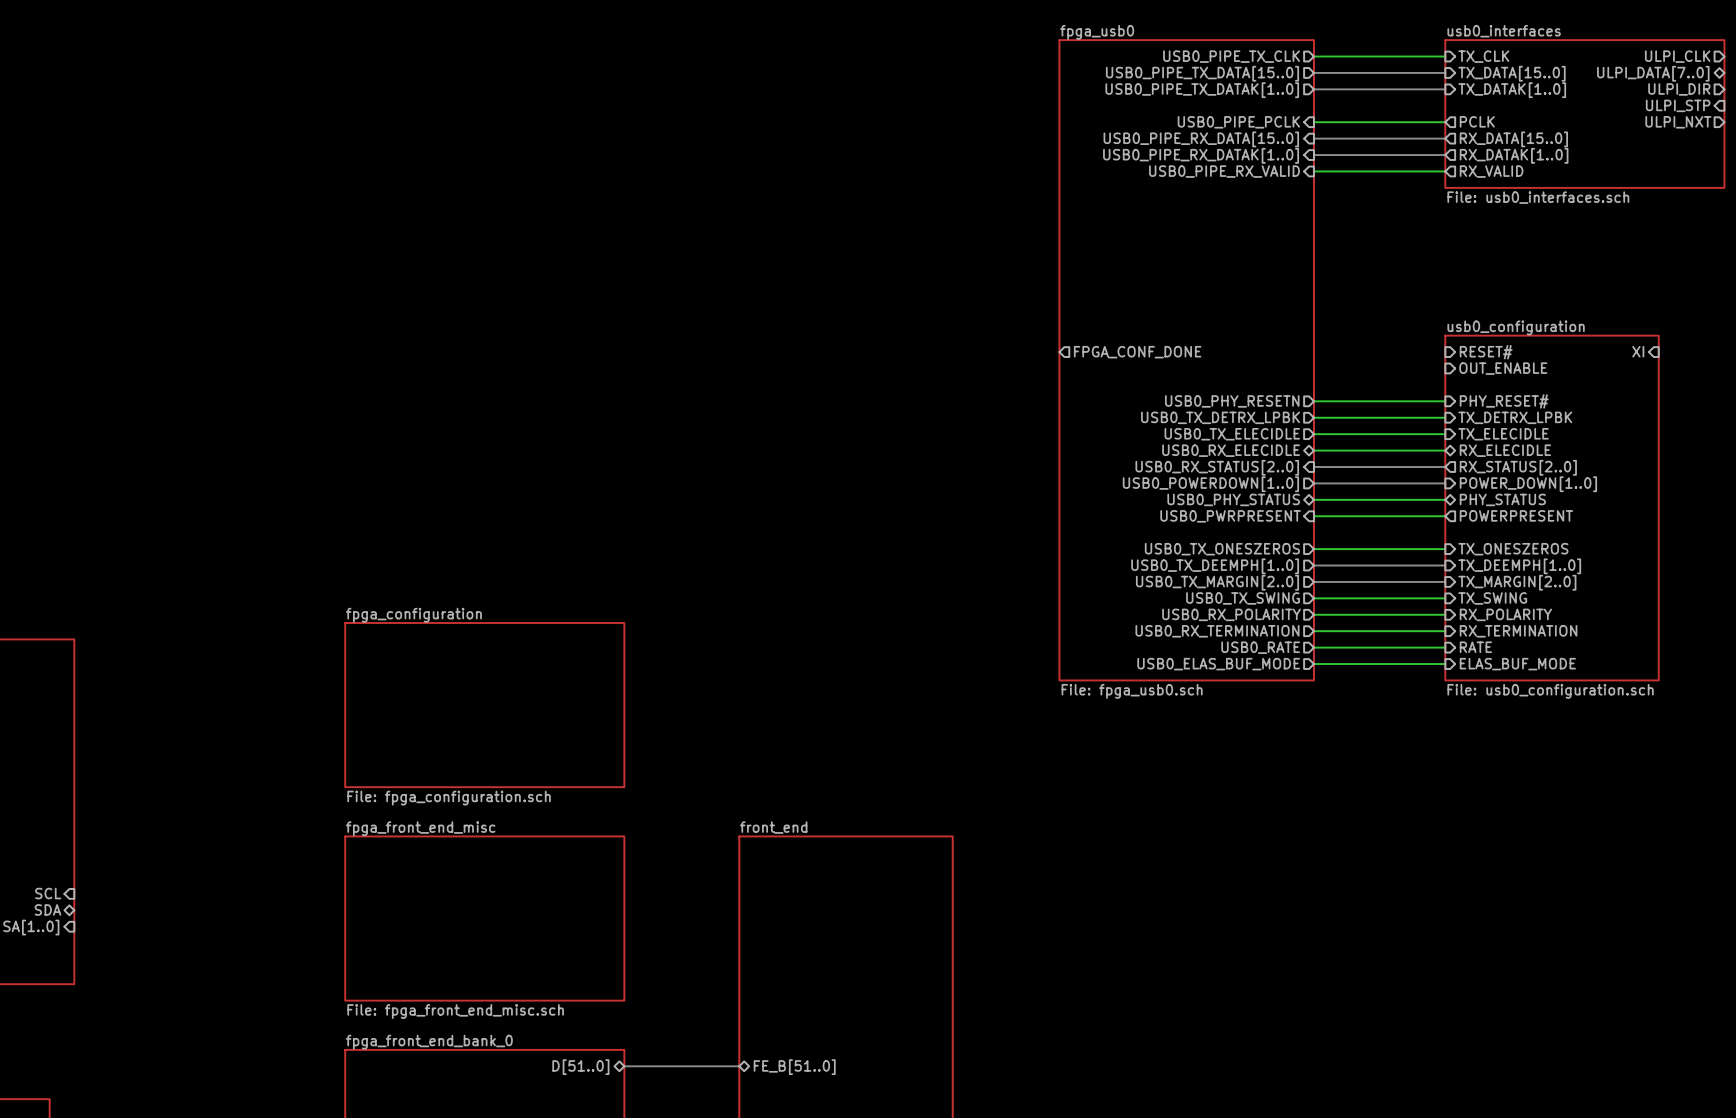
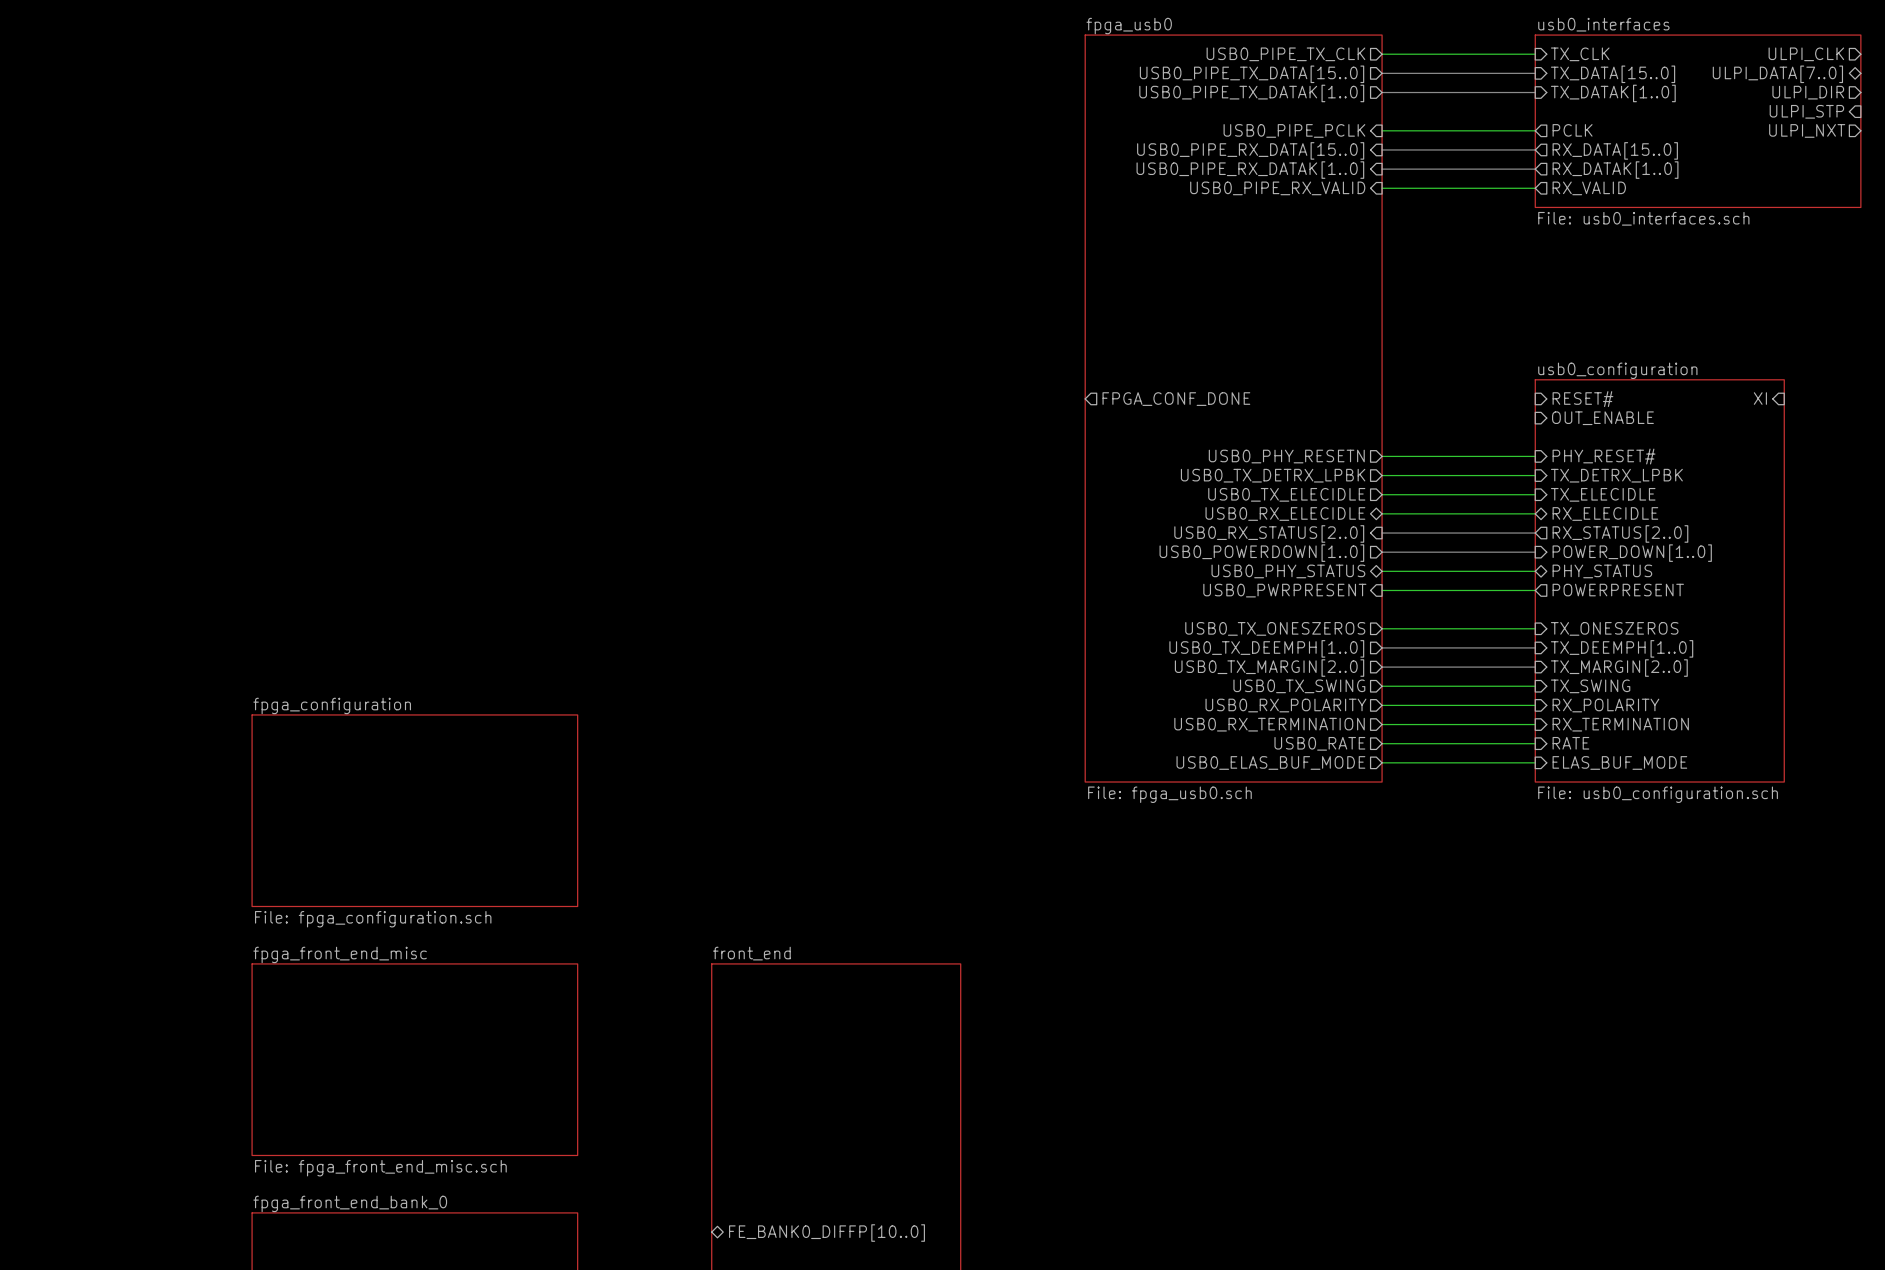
bus: (624, 1066) (739, 1066) -> none
sheet pin: D[51..0] (580, 1067) -> none
sheet pin: FE_B[51..0] (794, 1067) -> FE_BANK0_DIFFP[10..0] (826, 1233)

